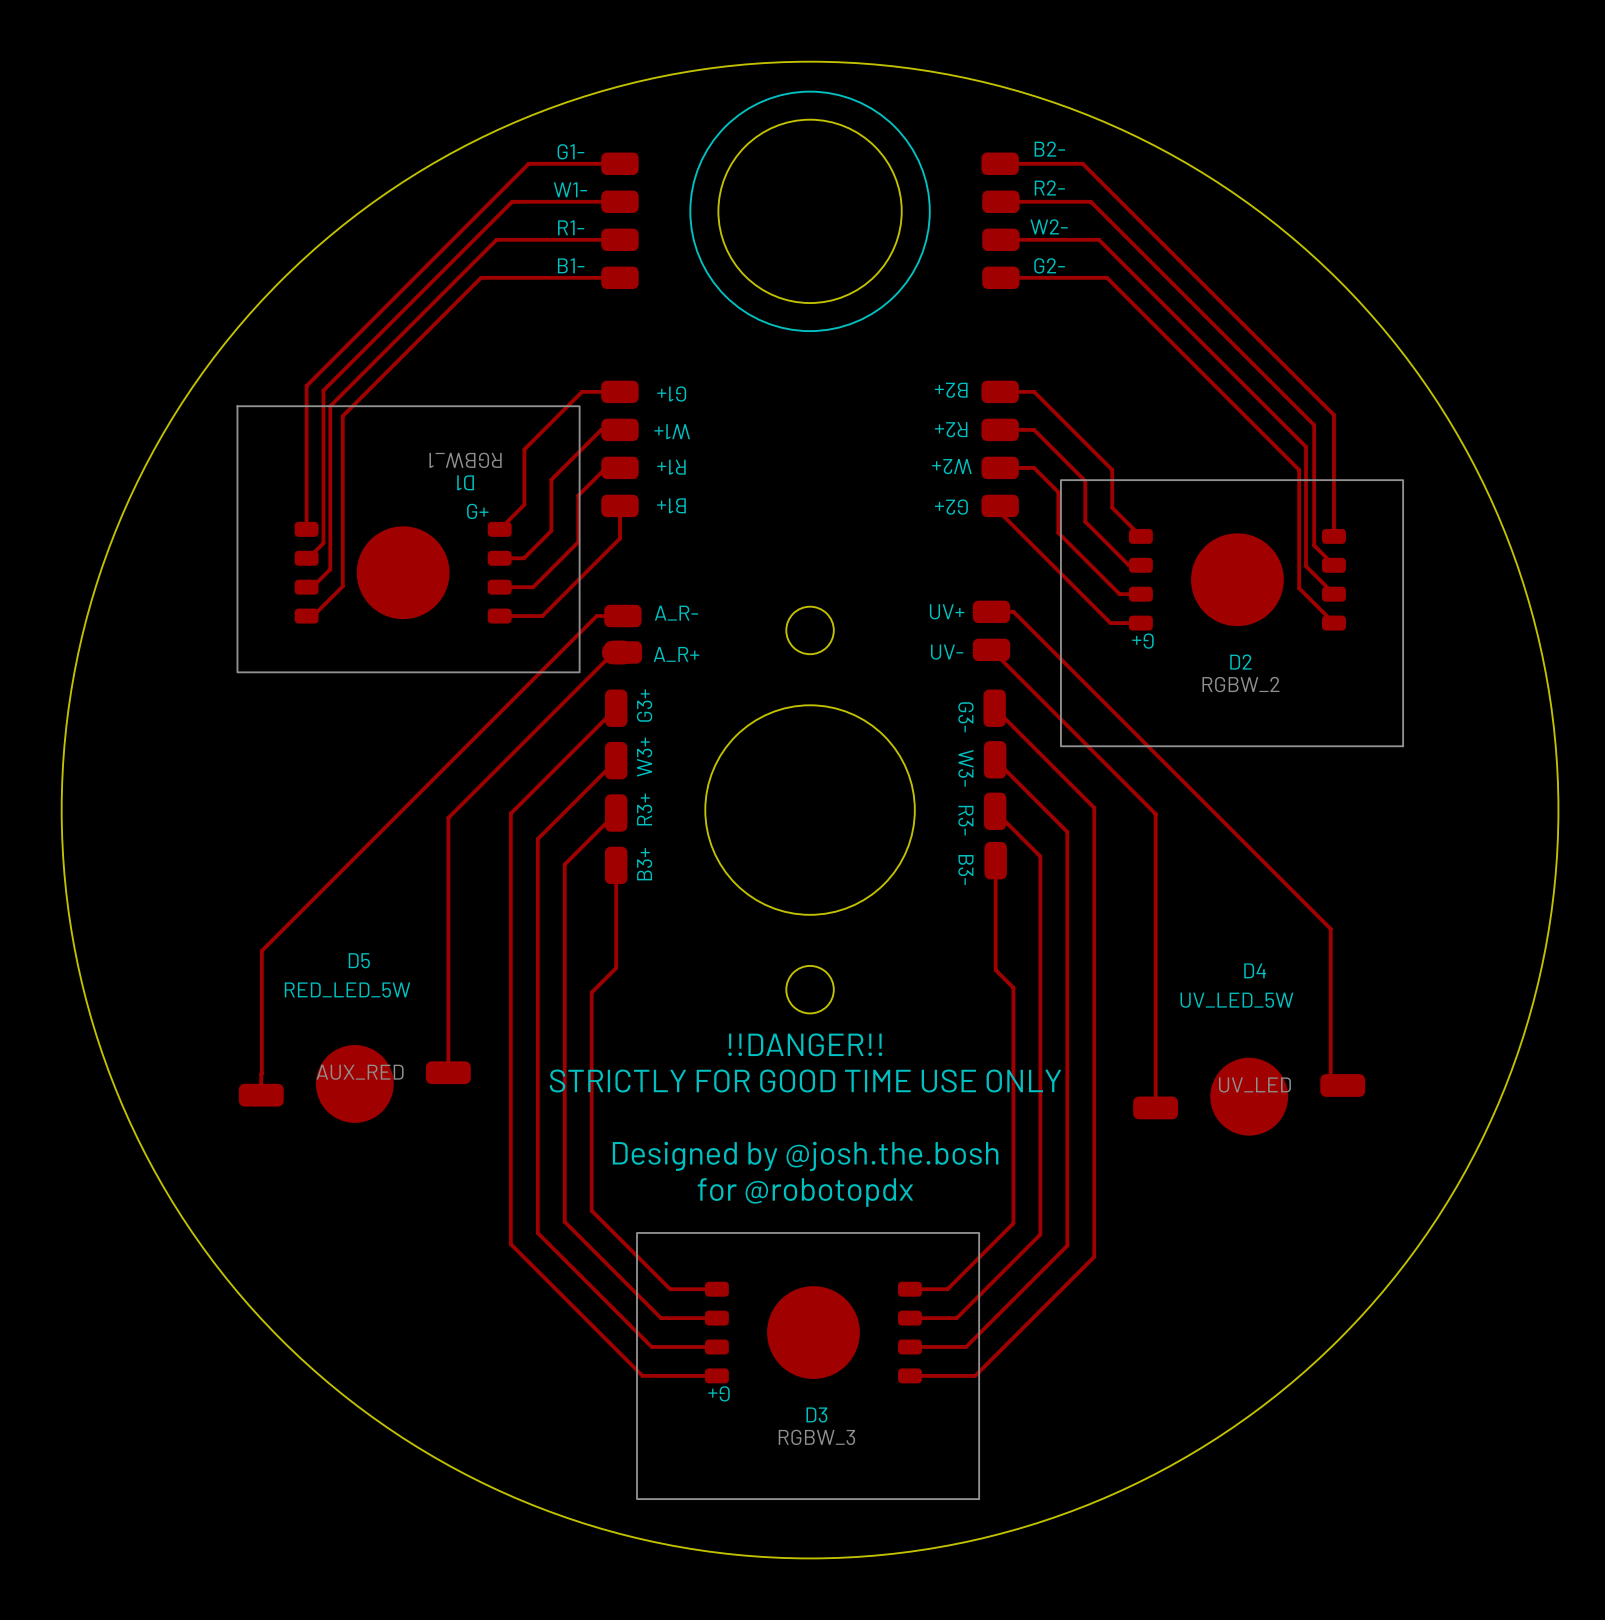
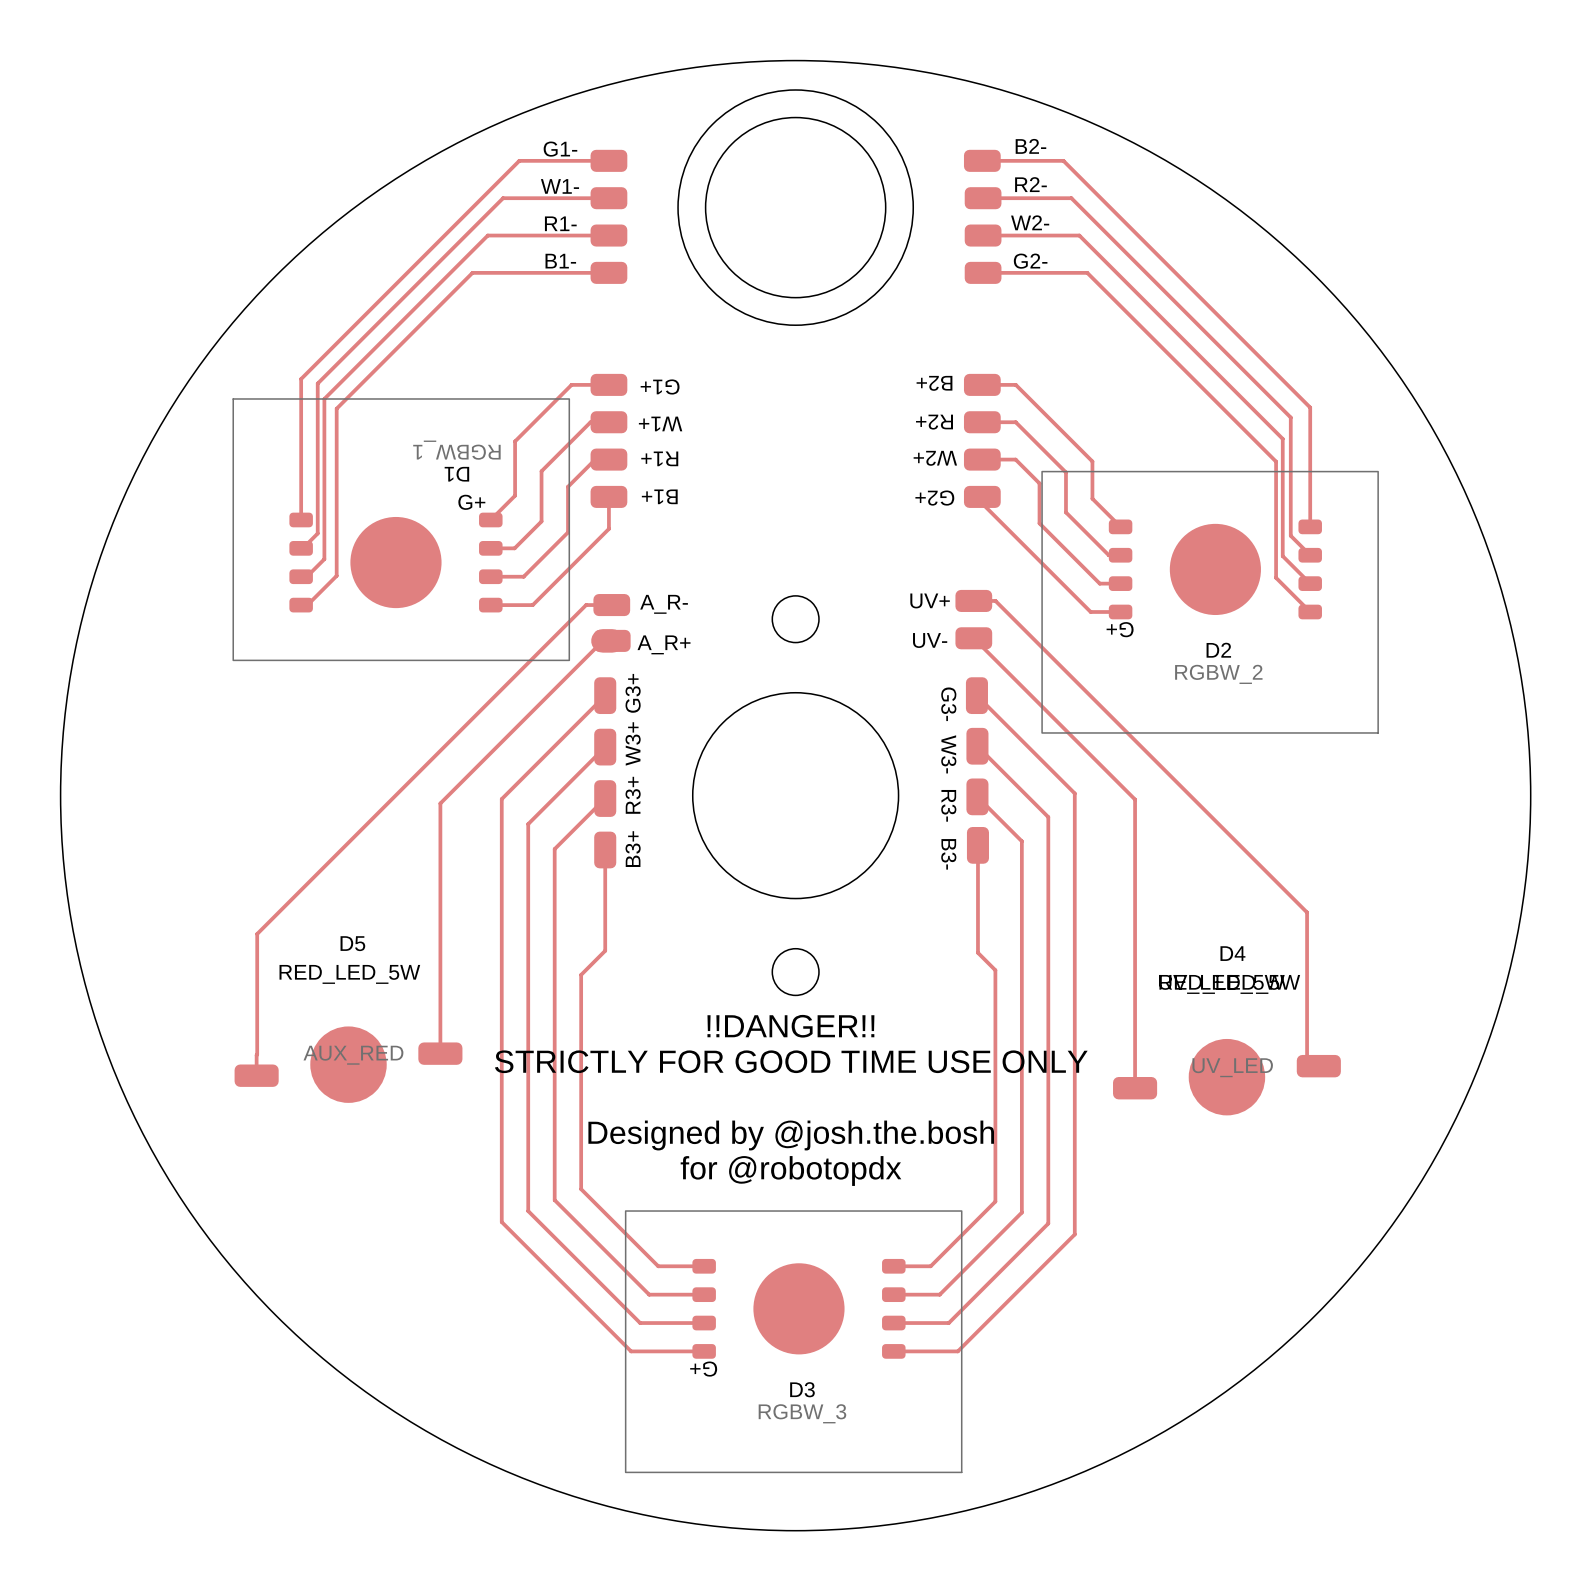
D4 footprint: [1133, 1057, 1366, 1136] -> [1113, 1038, 1341, 1116]

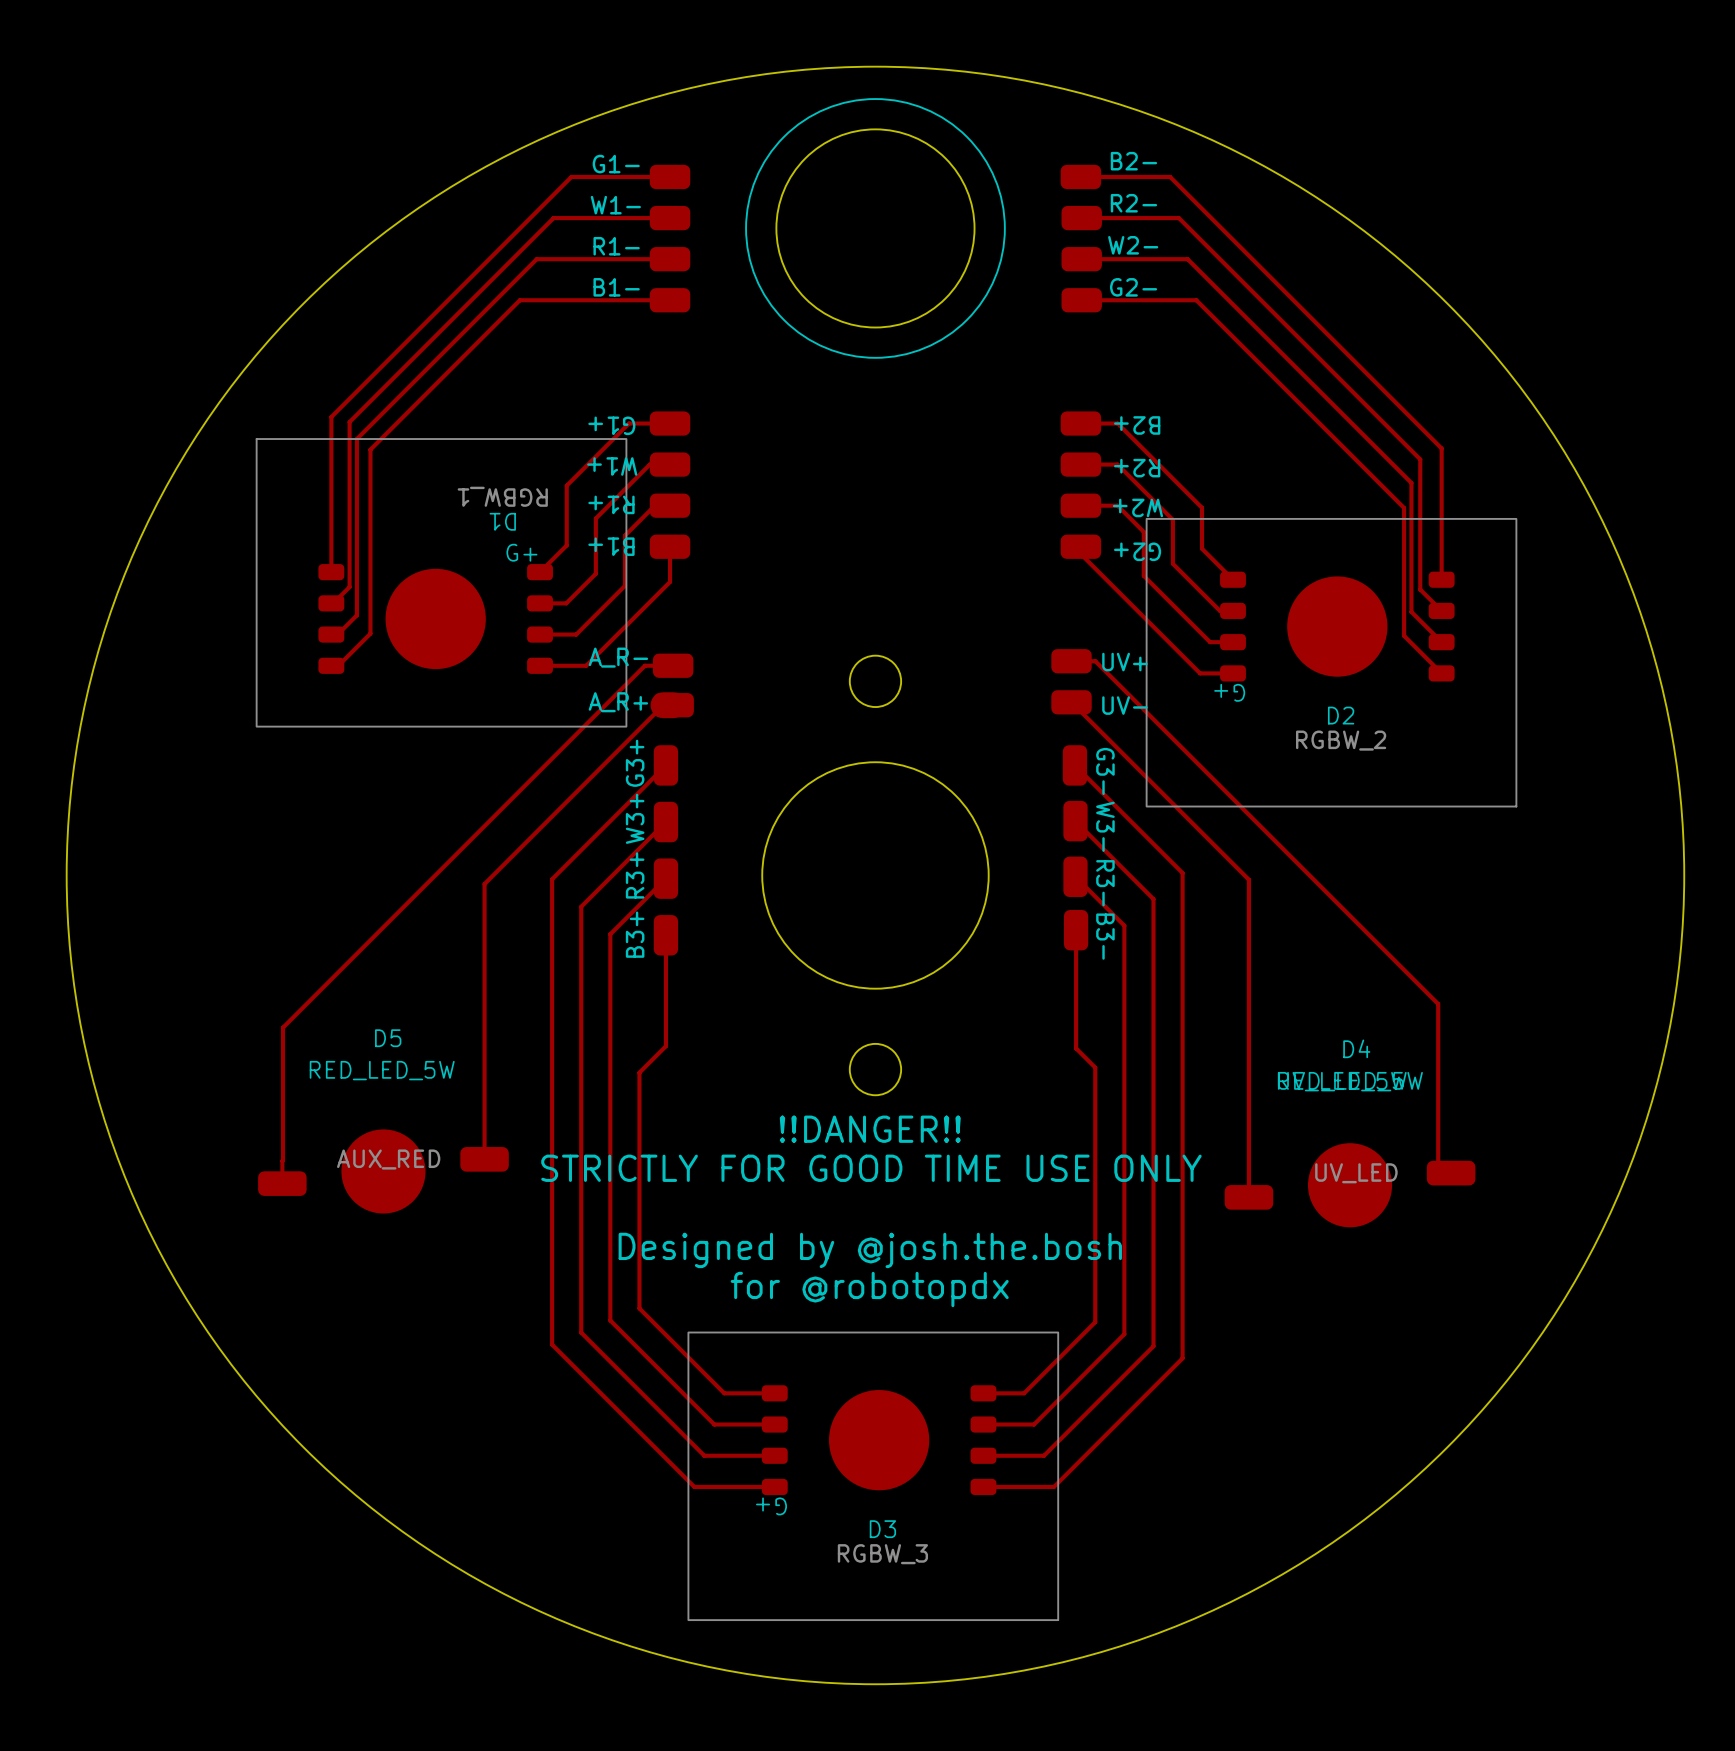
part value position: B2+ (934, 383) -> B2+ (1137, 425)
part value position: G1+ (660, 386) -> G1+ (611, 425)
part value position: R2+ (934, 422) -> R2+ (1137, 468)
part value position: W1+ (660, 423) -> W1+ (612, 466)
part value position: R1+ (659, 458) -> R1+ (611, 504)
part value position: W2+ (935, 458) -> W2+ (1137, 507)
part value position: B1+ (659, 496) -> B1+ (611, 546)
part value position: G2+ (934, 498) -> G2+ (1137, 551)
part value position: UV+ (930, 600) -> UV+ (1124, 662)
part value position: A_R- (664, 604) -> A_R- (618, 657)
part value position: UV- (930, 640) -> UV- (1124, 705)
part value position: A_R+ (664, 644) -> A_R+ (618, 702)
part value position: G3+ (633, 693) -> G3+ (635, 763)
part value position: G3- (948, 704) -> G3- (1105, 771)
part value position: W3+ (633, 743) -> W3+ (635, 818)
part value position: W3- (948, 754) -> W3- (1105, 826)
part value position: R3+ (633, 795) -> R3+ (635, 875)
part value position: R3- (948, 805) -> R3- (1105, 883)
part value position: B3+ (633, 849) -> B3+ (635, 934)
part value position: B3- (948, 854) -> B3- (1105, 936)

